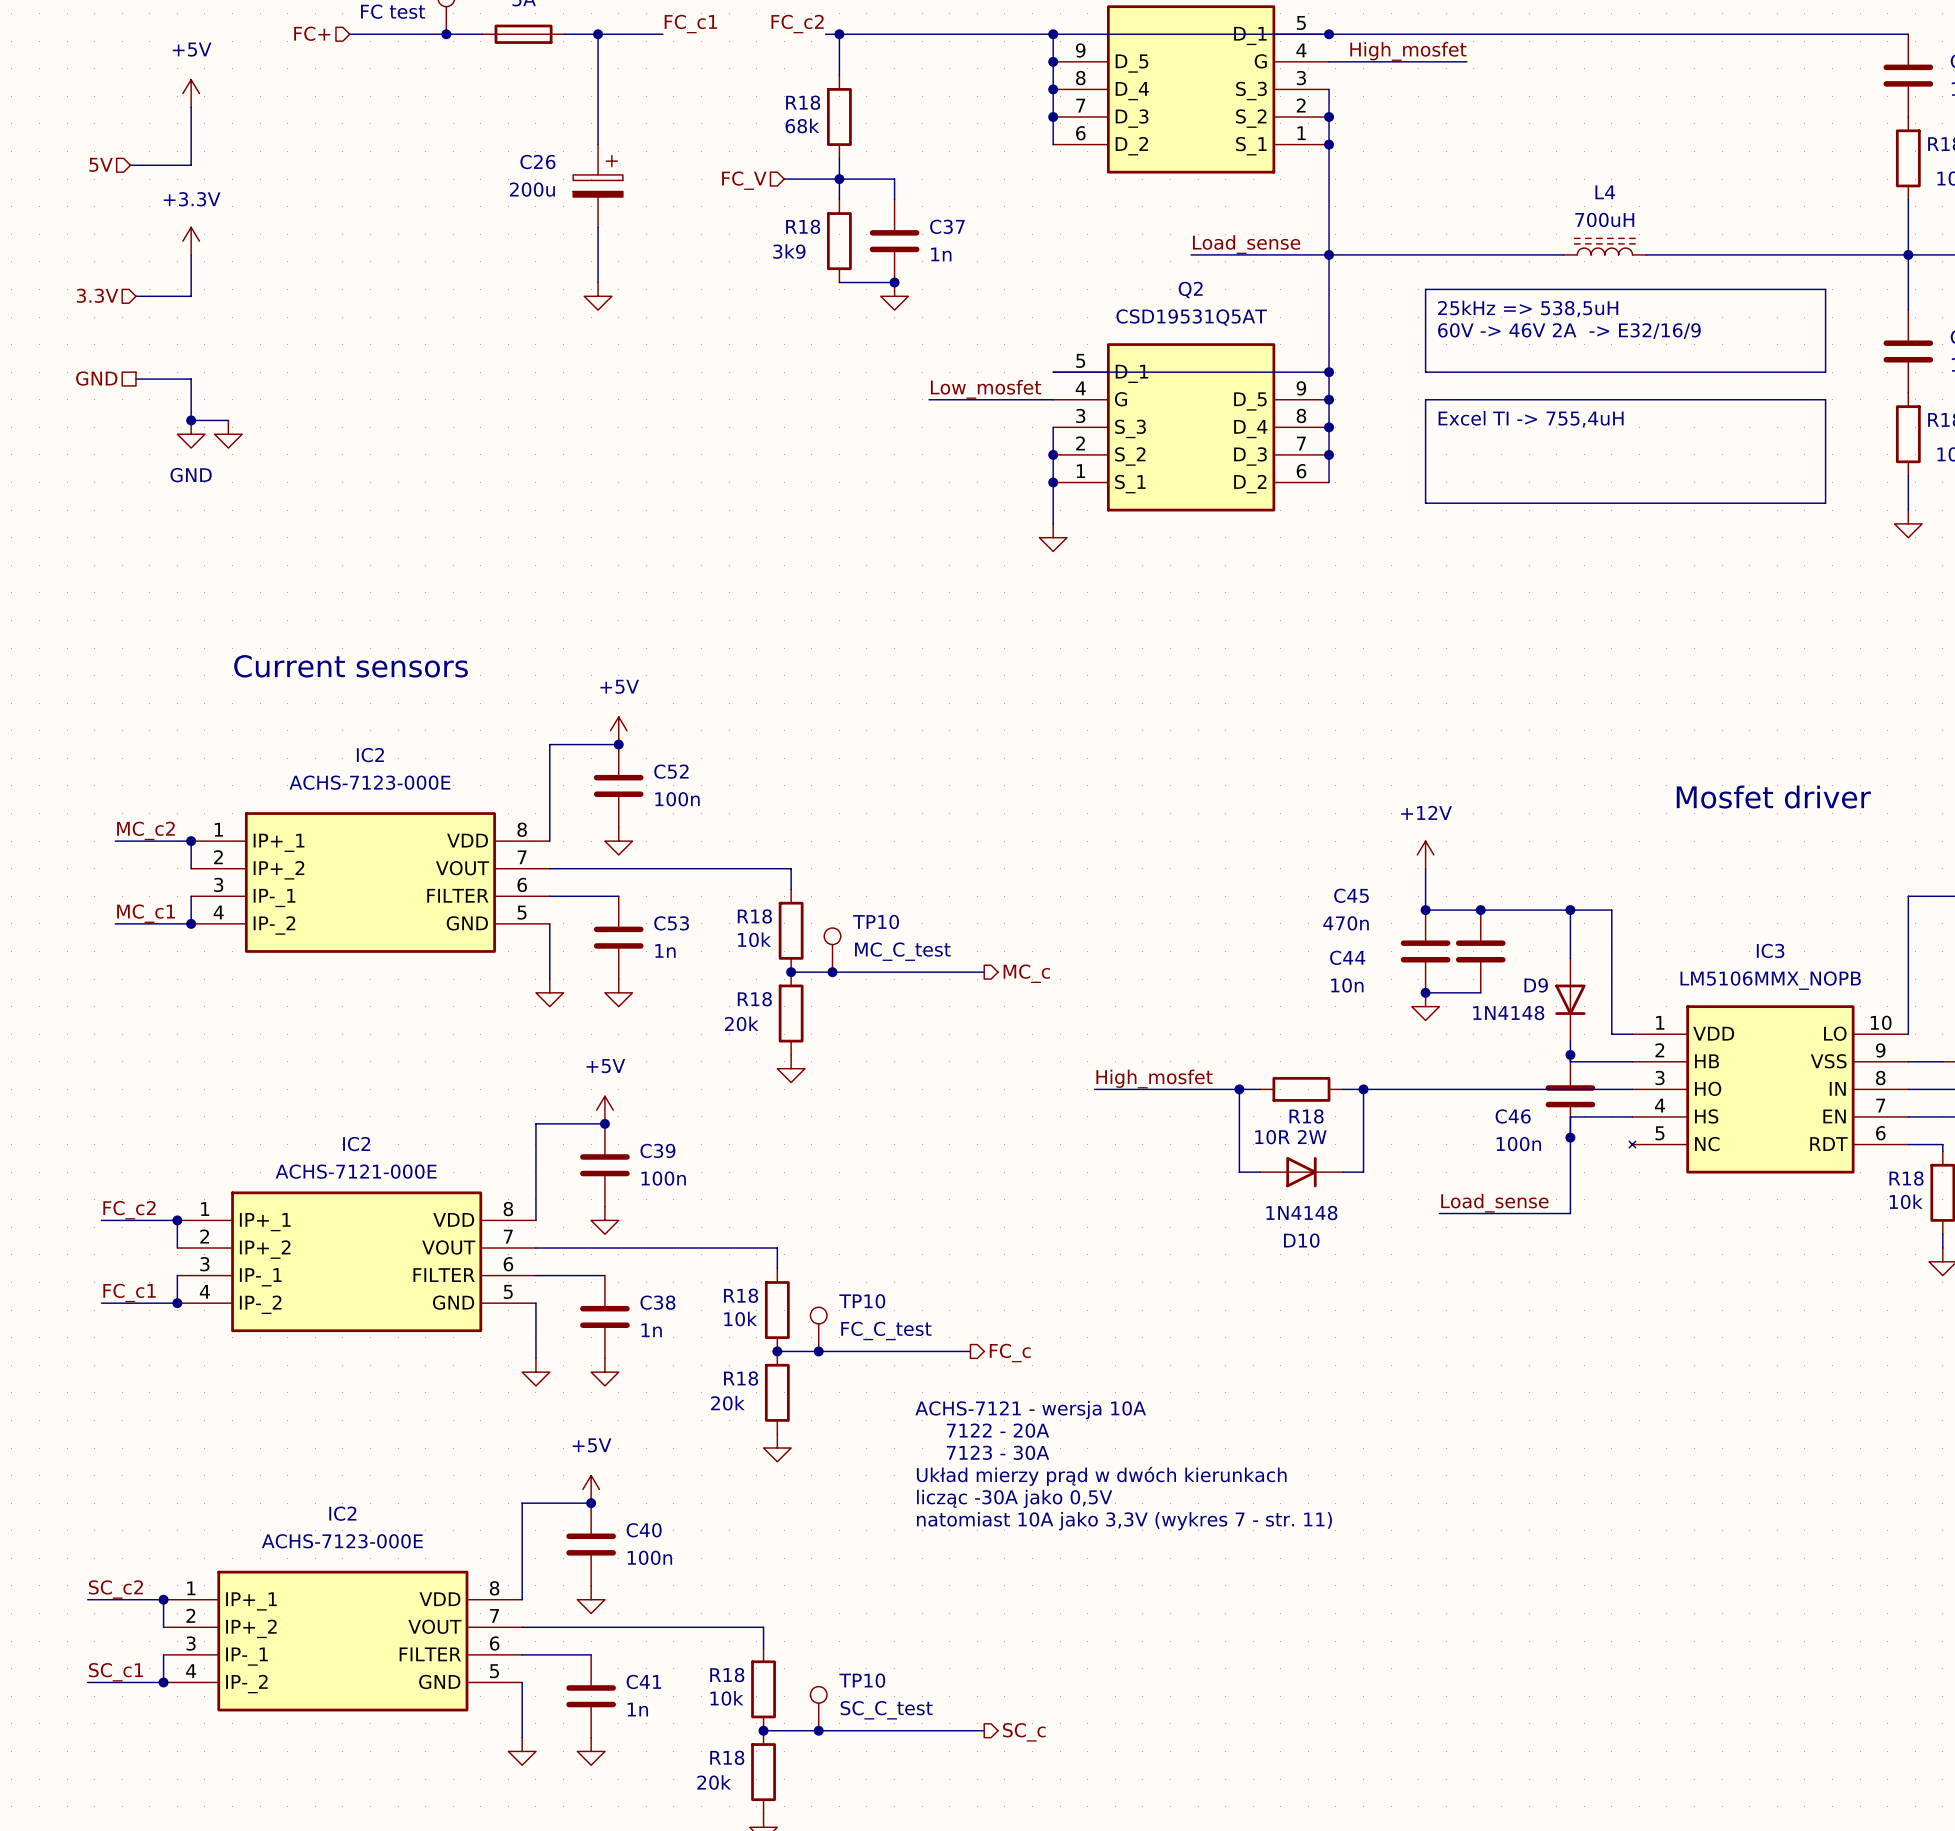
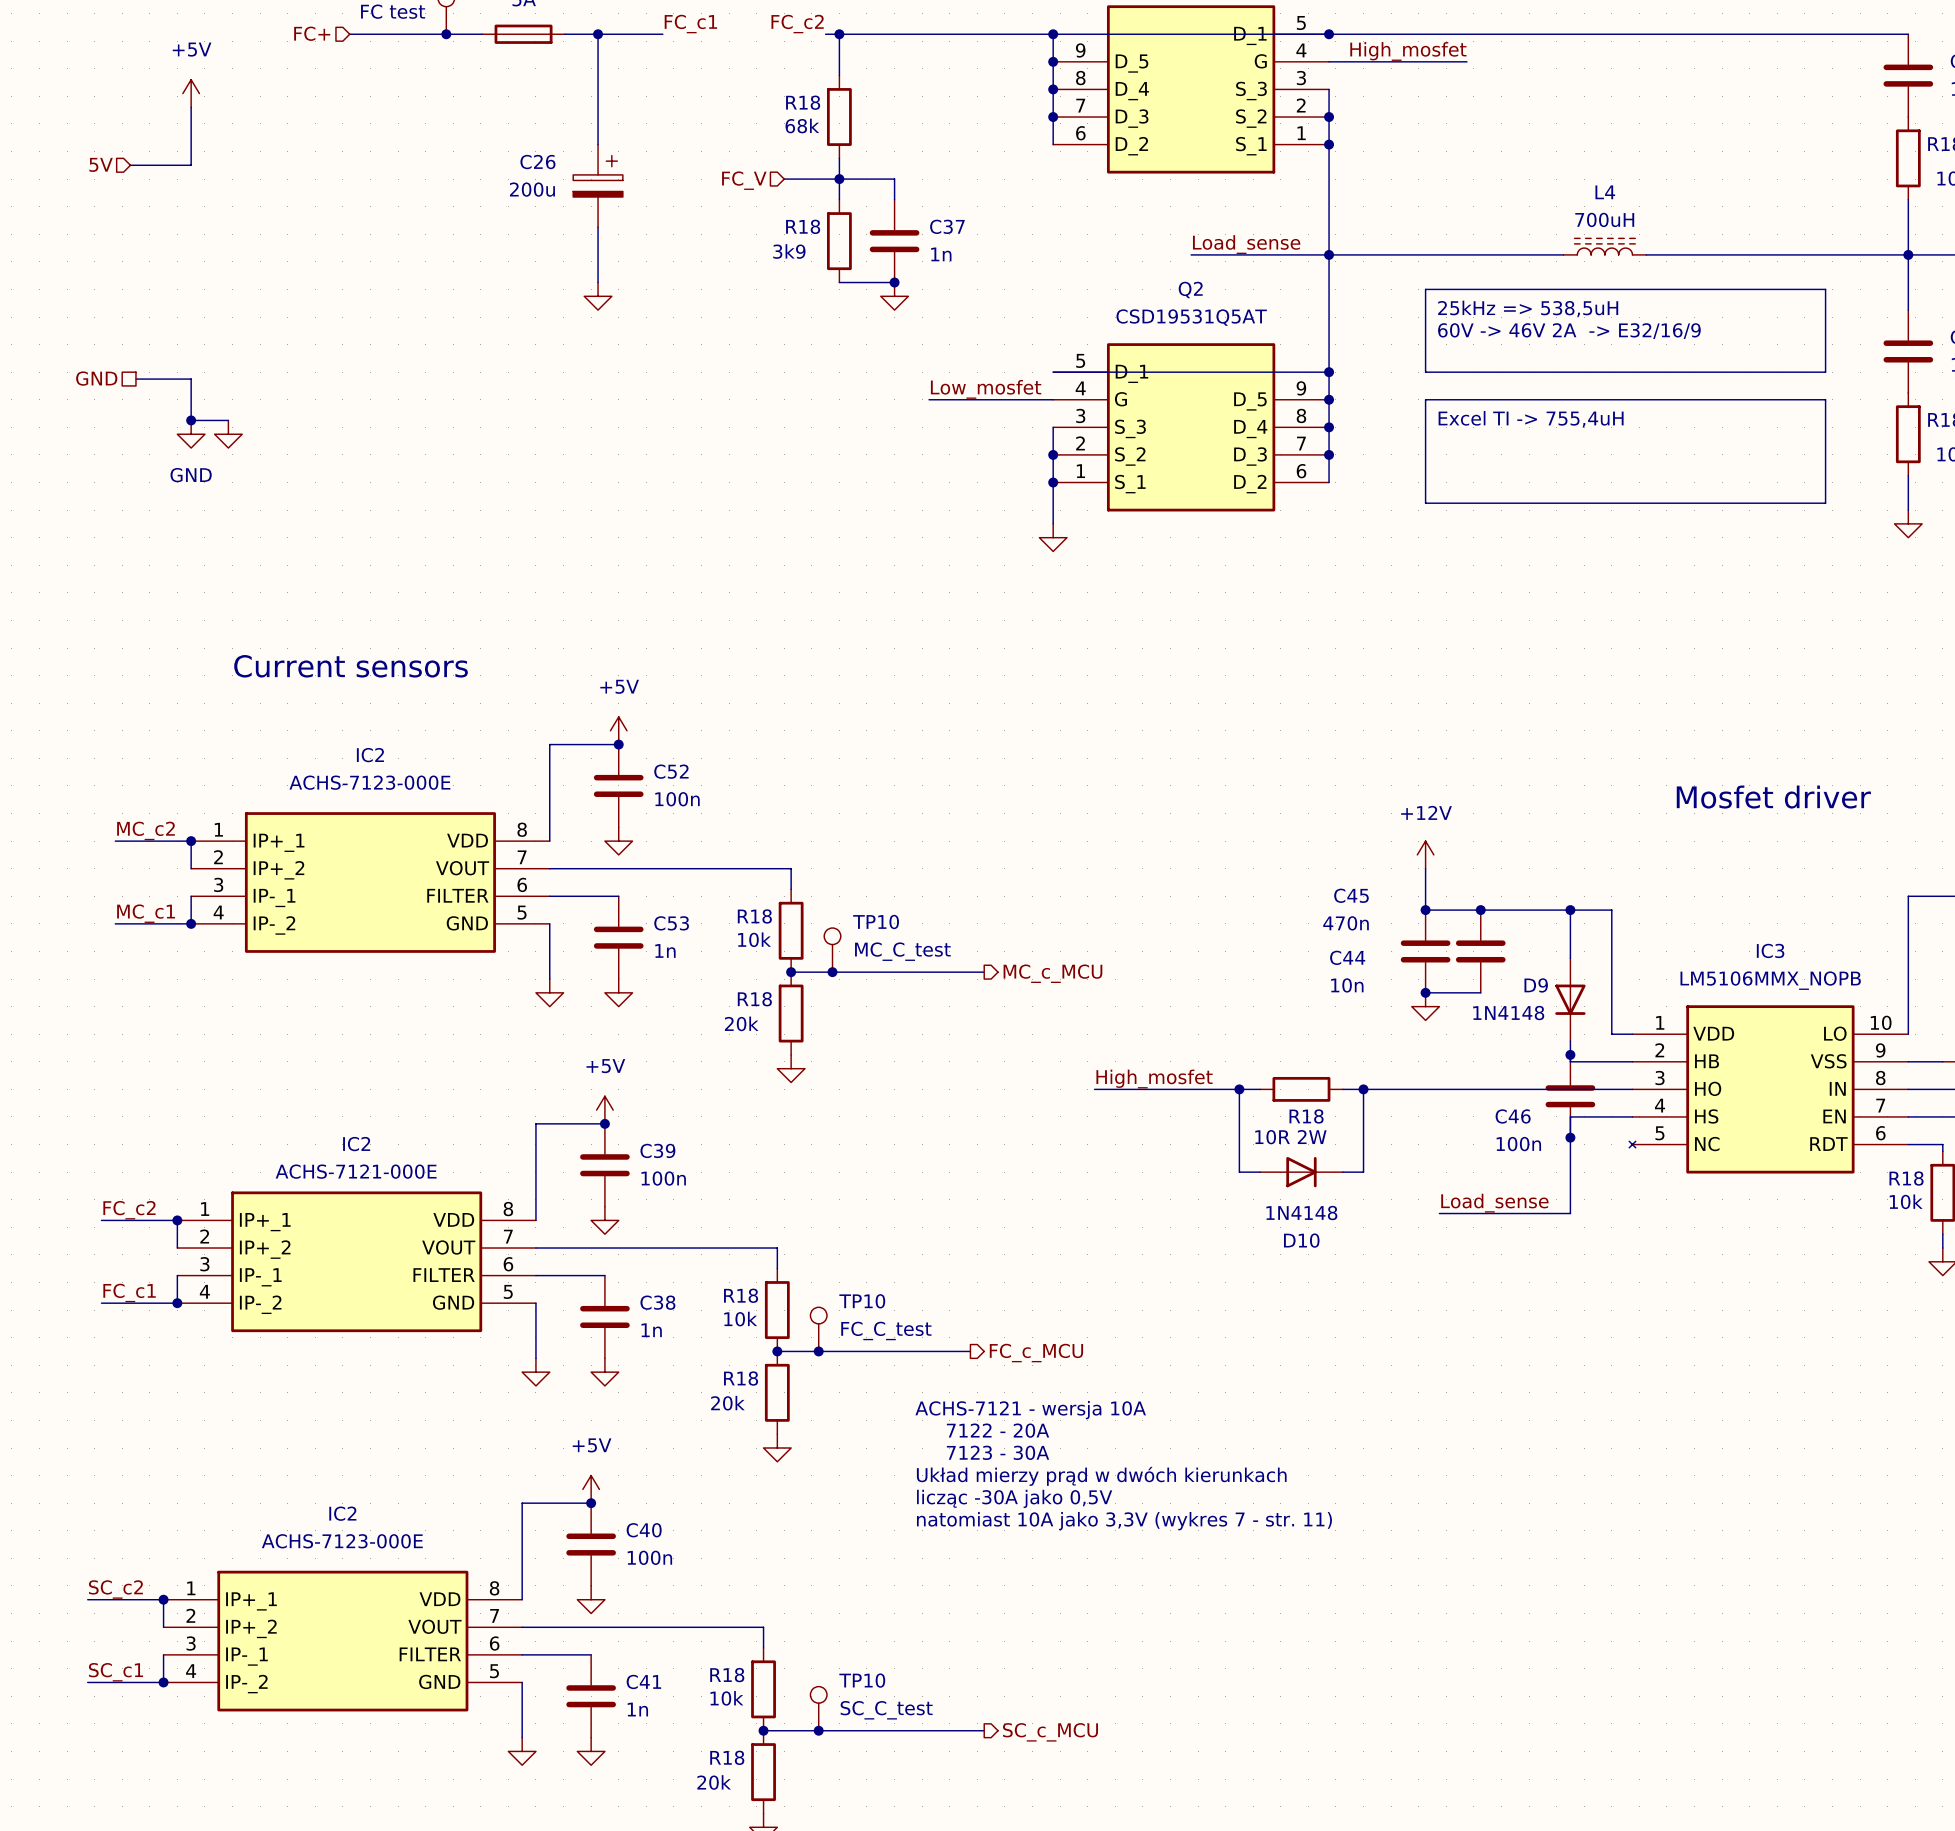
power symbol: +3.3V (191, 241) -> none
wire: (191, 254) (191, 296) (135, 296) -> none
hierarchical label: 3.3V (97, 295) -> none
hierarchical label: MC_c (1026, 973) -> MC_c_MCU (1052, 973)
hierarchical label: FC_c (1010, 1353) -> FC_c_MCU (1036, 1353)
hierarchical label: SC_c (1024, 1732) -> SC_c_MCU (1050, 1732)

